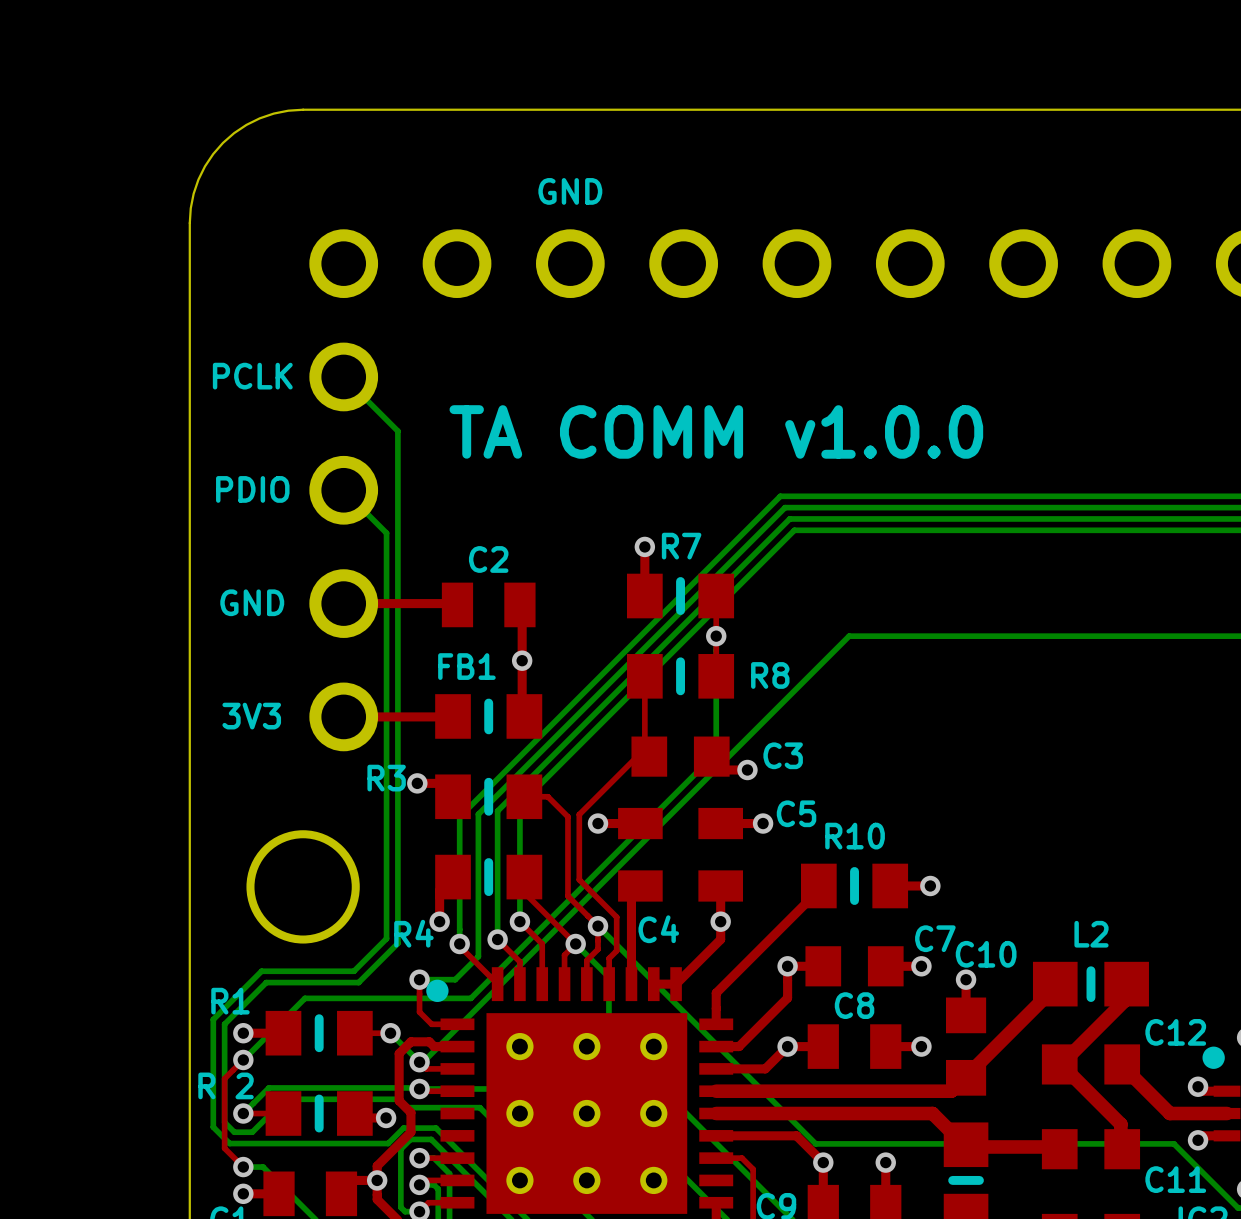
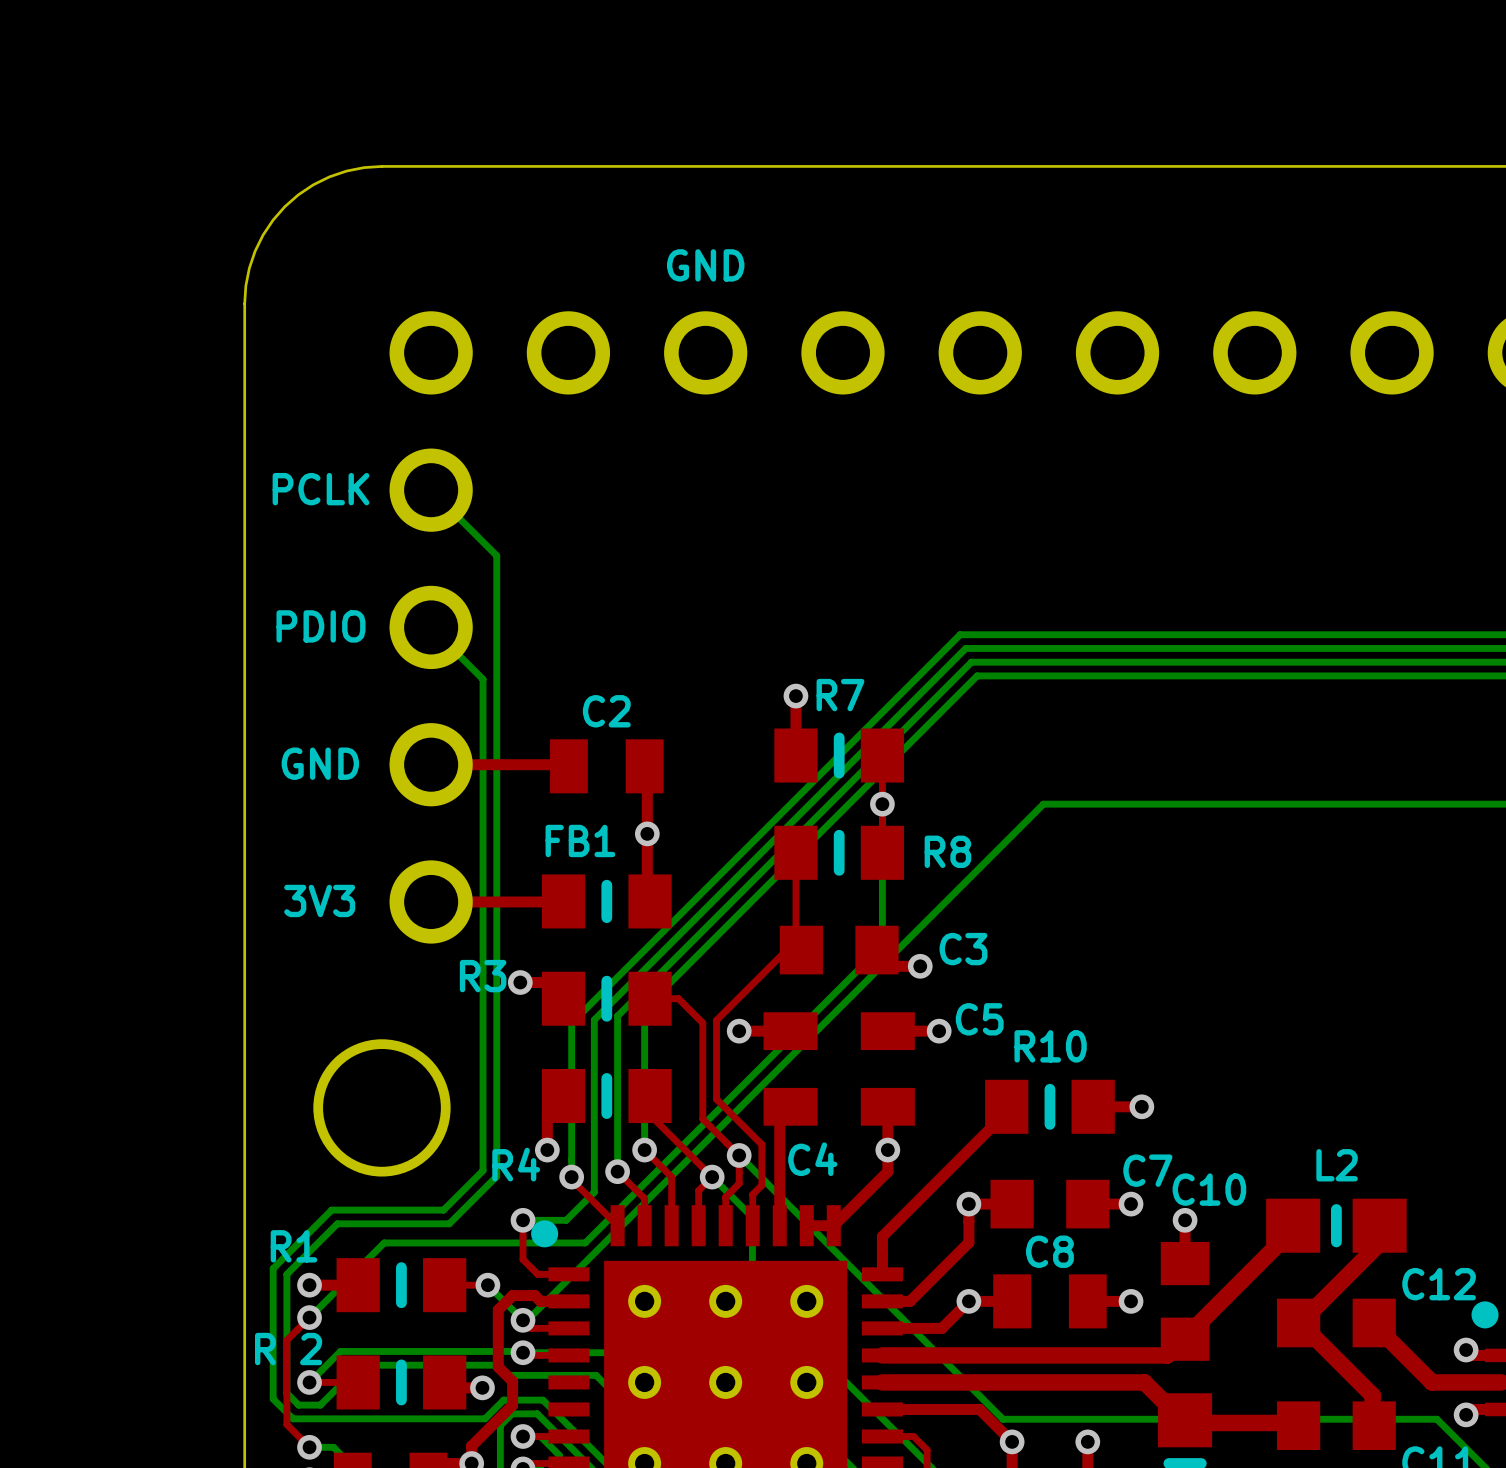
text: TA COMM v1.0.0 (716, 431) -> none

